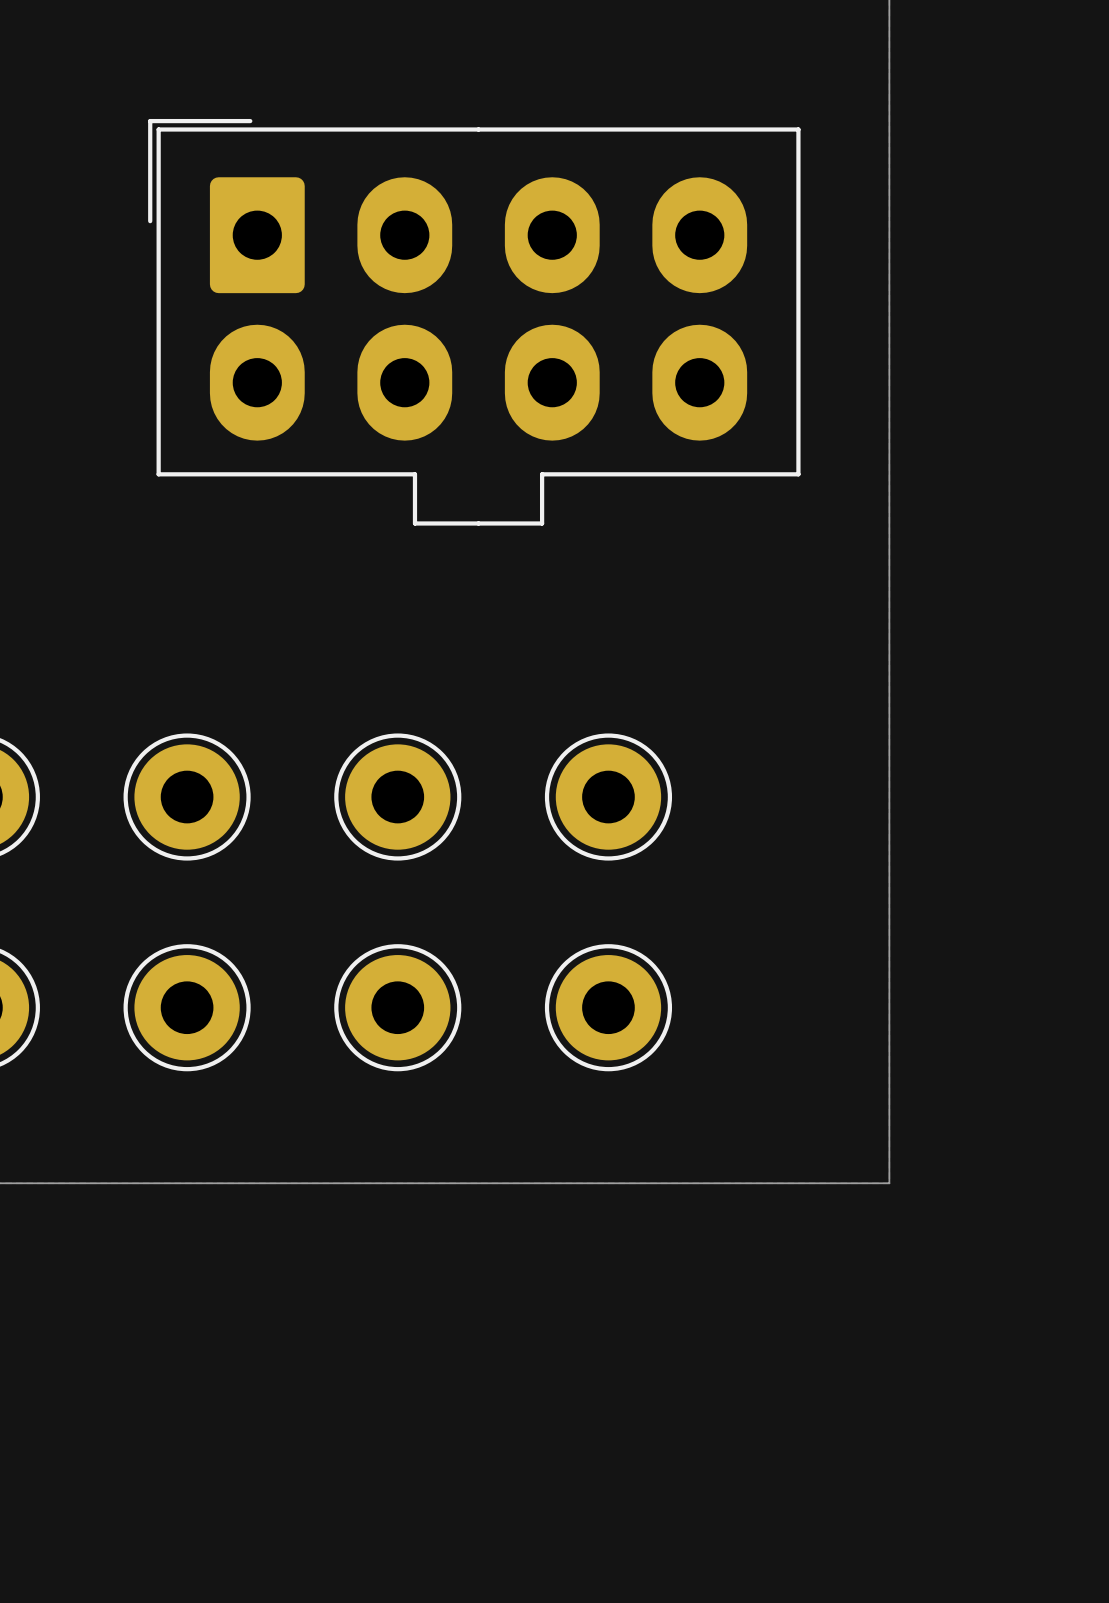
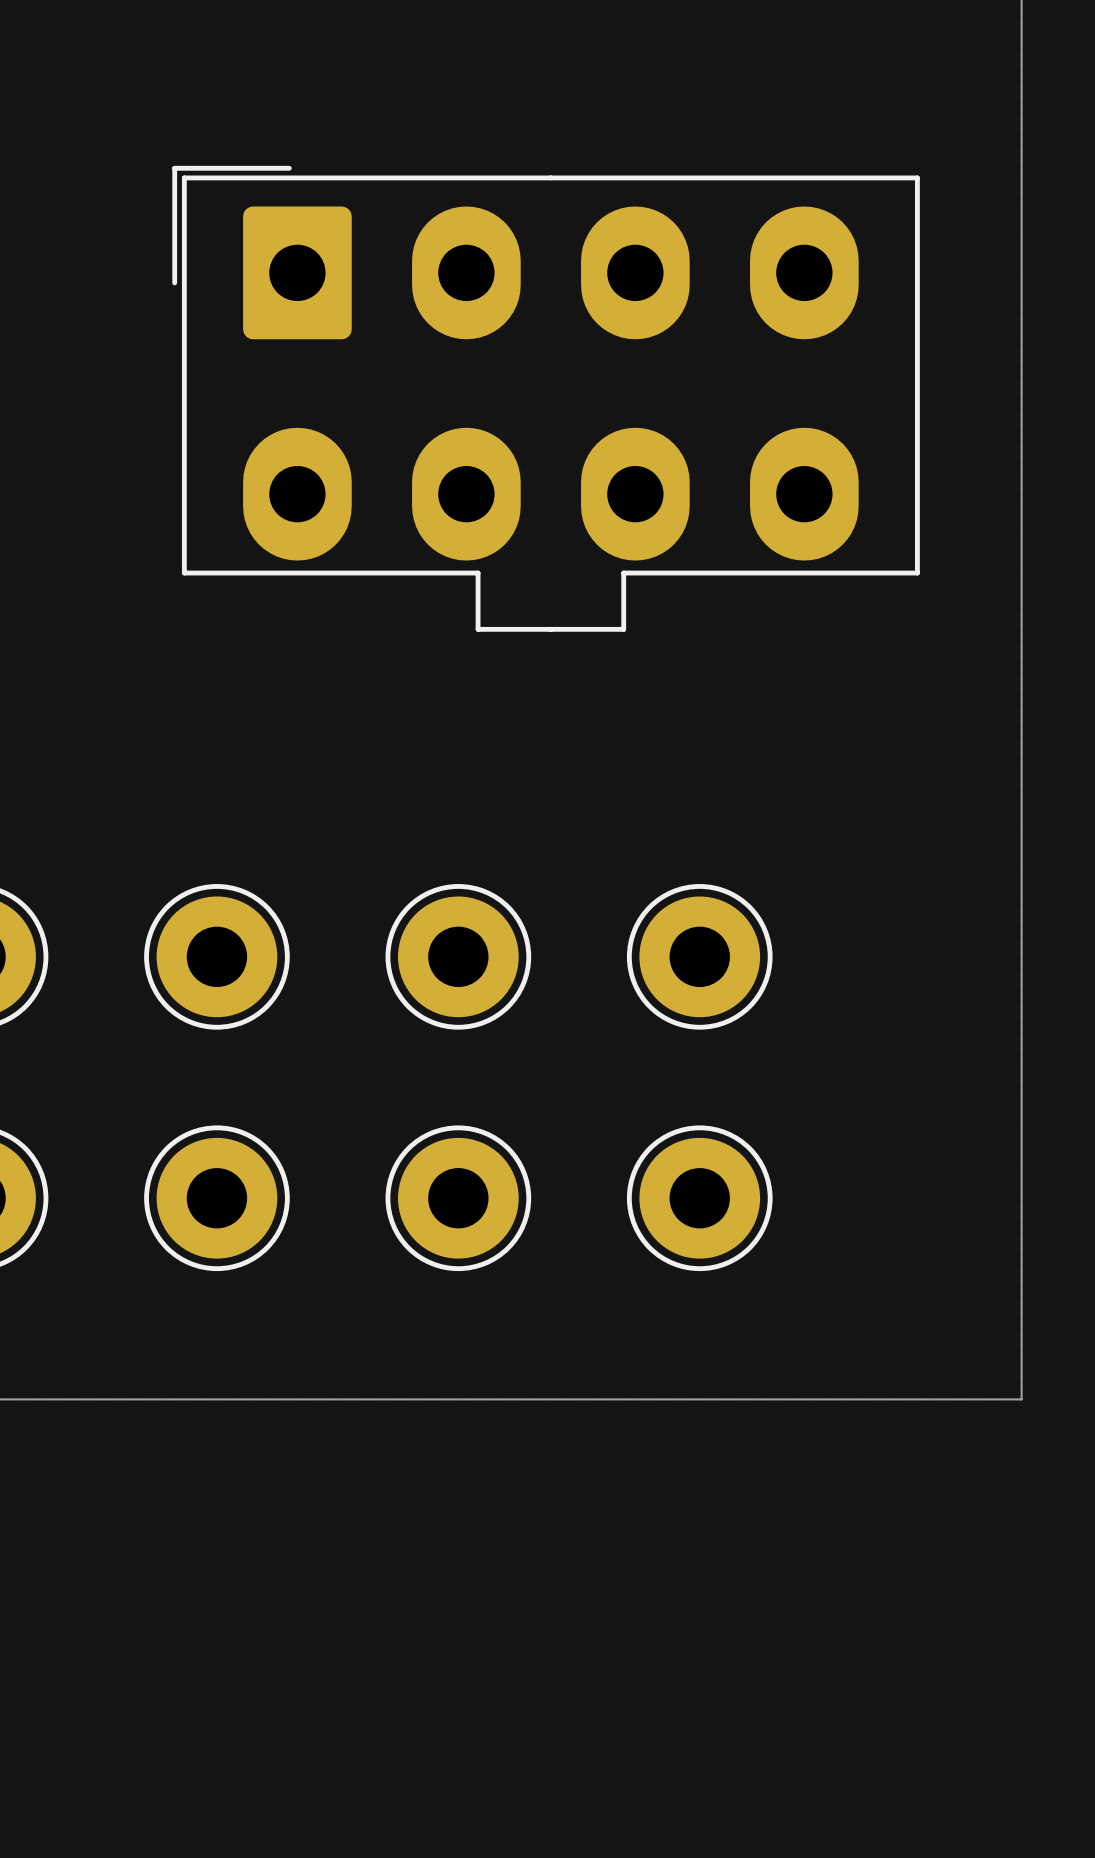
part footprint: [148, 118, 801, 526] -> [172, 165, 920, 632]

